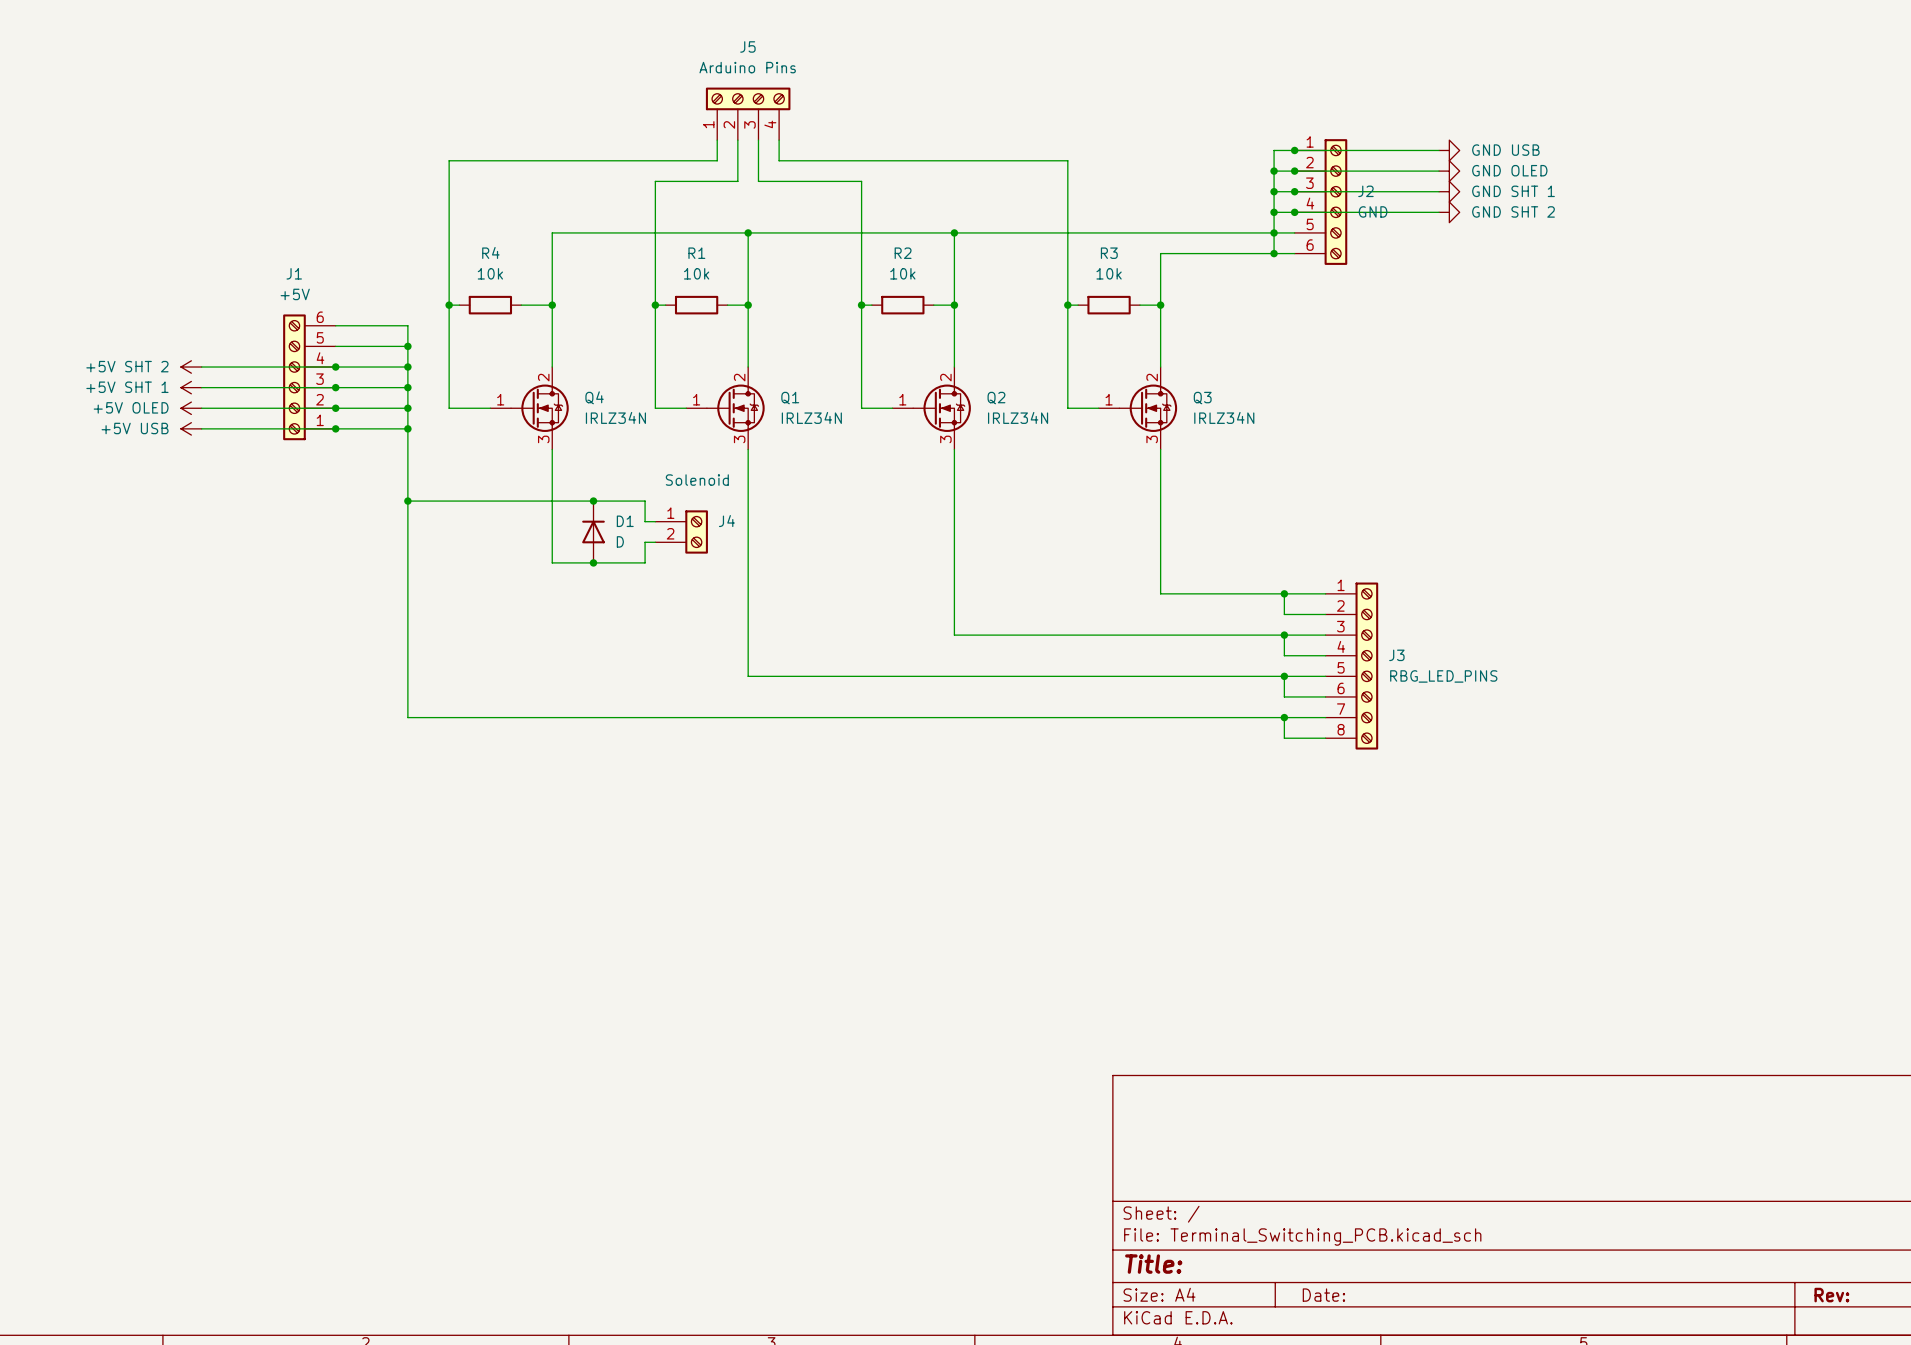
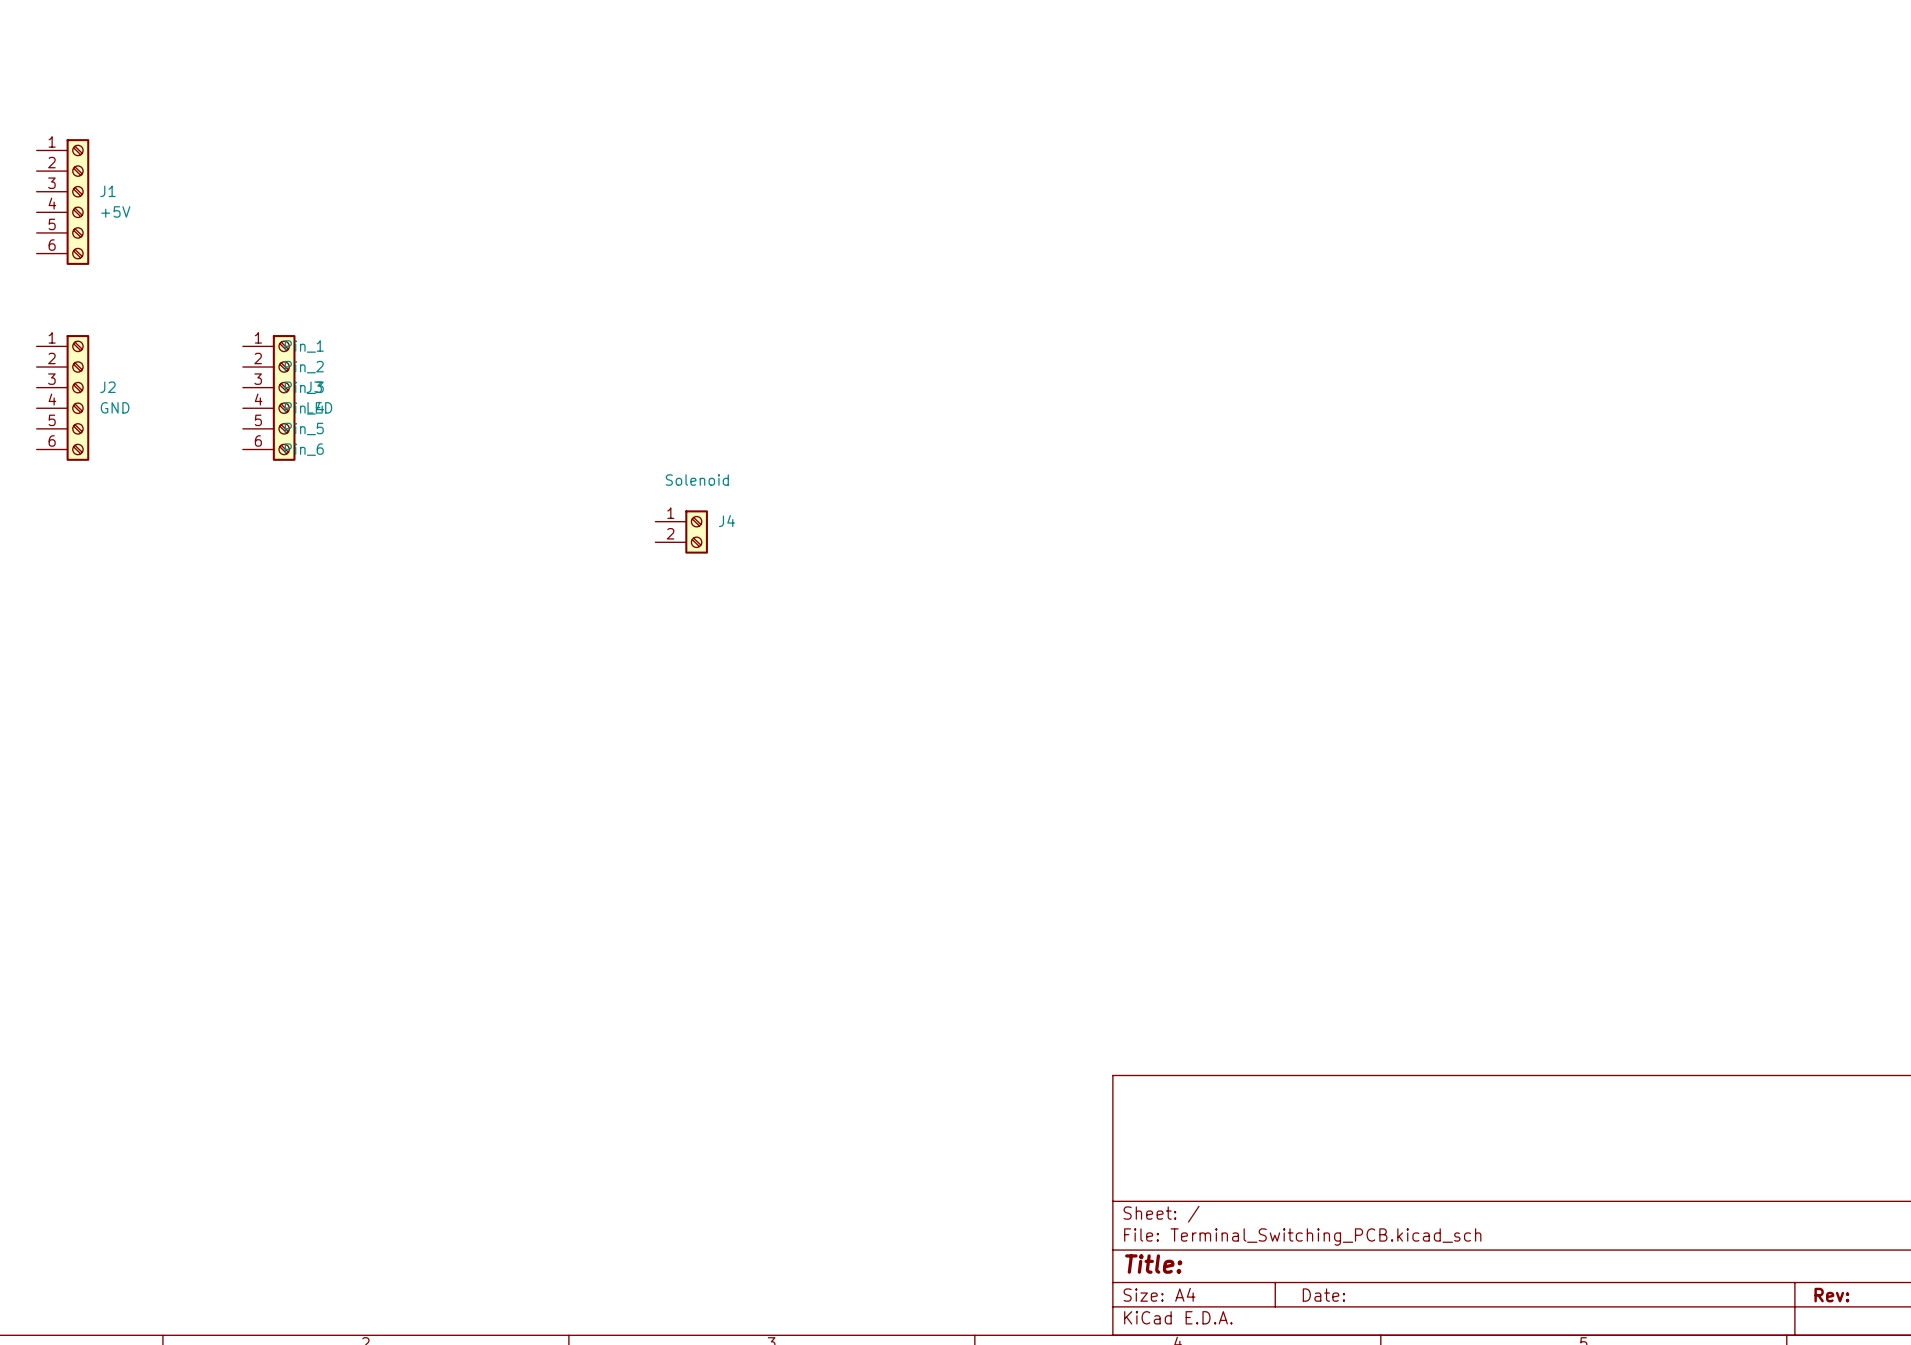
J5: Arduino Pins (748, 113) -> none
wire: (717, 140) (717, 160) (449, 160) (449, 408) (490, 408) -> none
wire: (737, 140) (737, 181) (655, 181) (655, 408) (686, 408) -> none
wire: (758, 140) (758, 181) (861, 181) (861, 408) (892, 408) -> none
wire: (779, 140) (779, 160) (1067, 160) (1067, 408) (1098, 408) -> none
junction: (1294, 150) -> none
wire: (1439, 150) (1274, 150) (1274, 253) -> none
power symbol: GND USB (1449, 150) -> none
wire: (1274, 171) (1439, 171) -> none
junction: (1274, 171) -> none
junction: (1294, 171) -> none
power symbol: GND OLED (1449, 171) -> none
wire: (1274, 191) (1439, 191) -> none
junction: (1274, 191) -> none
junction: (1294, 191) -> none
power symbol: GND SHT 1 (1449, 191) -> none
J2 position: (1320, 202) -> (62, 397)
wire: (1274, 212) (1439, 212) -> none
junction: (1274, 212) -> none
junction: (1294, 212) -> none
power symbol: GND SHT 2 (1449, 212) -> none
wire: (748, 232) (748, 367) -> none
junction: (748, 232) -> none
wire: (954, 232) (954, 367) -> none
junction: (954, 232) -> none
junction: (1274, 232) -> none
wire: (1294, 232) (552, 232) (552, 367) -> none
junction: (1274, 253) -> none
wire: (1294, 253) (1160, 253) (1160, 367) -> none
J1 name position: J1 (294, 273) -> J1 (107, 191)
J1 value position: +5V (295, 294) -> +5V (115, 211)
wire: (449, 305) (459, 305) -> none
junction: (449, 305) -> none
R4: 10k (490, 305) -> none
wire: (521, 305) (552, 305) -> none
junction: (552, 305) -> none
wire: (655, 305) (665, 305) -> none
junction: (655, 305) -> none
R1: 10k (696, 305) -> none
wire: (727, 305) (748, 305) -> none
junction: (748, 305) -> none
wire: (861, 305) (871, 305) -> none
junction: (861, 305) -> none
R2: 10k (902, 305) -> none
wire: (933, 305) (954, 305) -> none
junction: (954, 305) -> none
wire: (1067, 305) (1078, 305) -> none
junction: (1067, 305) -> none
R3: 10k (1109, 305) -> none
wire: (1140, 305) (1160, 305) -> none
junction: (1160, 305) -> none
wire: (335, 325) (407, 325) (407, 717) (1325, 717) -> none
wire: (335, 346) (407, 346) -> none
junction: (407, 346) -> none
power symbol: +5V SHT 2 (191, 367) -> none
wire: (201, 367) (407, 367) -> none
junction: (335, 367) -> none
junction: (407, 367) -> none
J1 rotation: 0° (294, 377) -> 180° (77, 202)
J1 position: (309, 377) -> (62, 202)
power symbol: +5V SHT 1 (191, 387) -> none
wire: (201, 387) (407, 387) -> none
junction: (335, 387) -> none
junction: (407, 387) -> none
power symbol: +5V OLED (191, 408) -> none
wire: (201, 408) (407, 408) -> none
junction: (335, 408) -> none
junction: (407, 408) -> none
Q4: IRLZ34N (529, 408) -> none
Q1: IRLZ34N (725, 408) -> none
Q2: IRLZ34N (931, 408) -> none
Q3: IRLZ34N (1137, 408) -> none
power symbol: +5V USB (191, 428) -> none
wire: (201, 428) (407, 428) -> none
junction: (335, 428) -> none
junction: (407, 428) -> none
wire: (552, 449) (552, 562) (645, 562) (645, 542) (655, 542) -> none
wire: (748, 449) (748, 676) (1325, 676) -> none
wire: (954, 449) (954, 635) (1325, 635) -> none
wire: (1160, 449) (1160, 593) (1325, 593) -> none
wire: (407, 501) (645, 501) (645, 521) (655, 521) -> none
junction: (407, 501) -> none
junction: (593, 501) -> none
D1: D (593, 531) -> none
junction: (593, 562) -> none
J3 symbol: [1325, 582, 1379, 750] -> [242, 335, 296, 461]
wire: (1284, 593) (1284, 614) (1325, 614) -> none
junction: (1284, 593) -> none
wire: (1284, 635) (1284, 655) (1325, 655) -> none
junction: (1284, 635) -> none
wire: (1284, 676) (1284, 696) (1325, 696) -> none
junction: (1284, 676) -> none
J3 value: RBG_LED_PINS (1443, 676) -> LED (319, 407)
wire: (1284, 717) (1284, 738) (1325, 738) -> none
junction: (1284, 717) -> none

